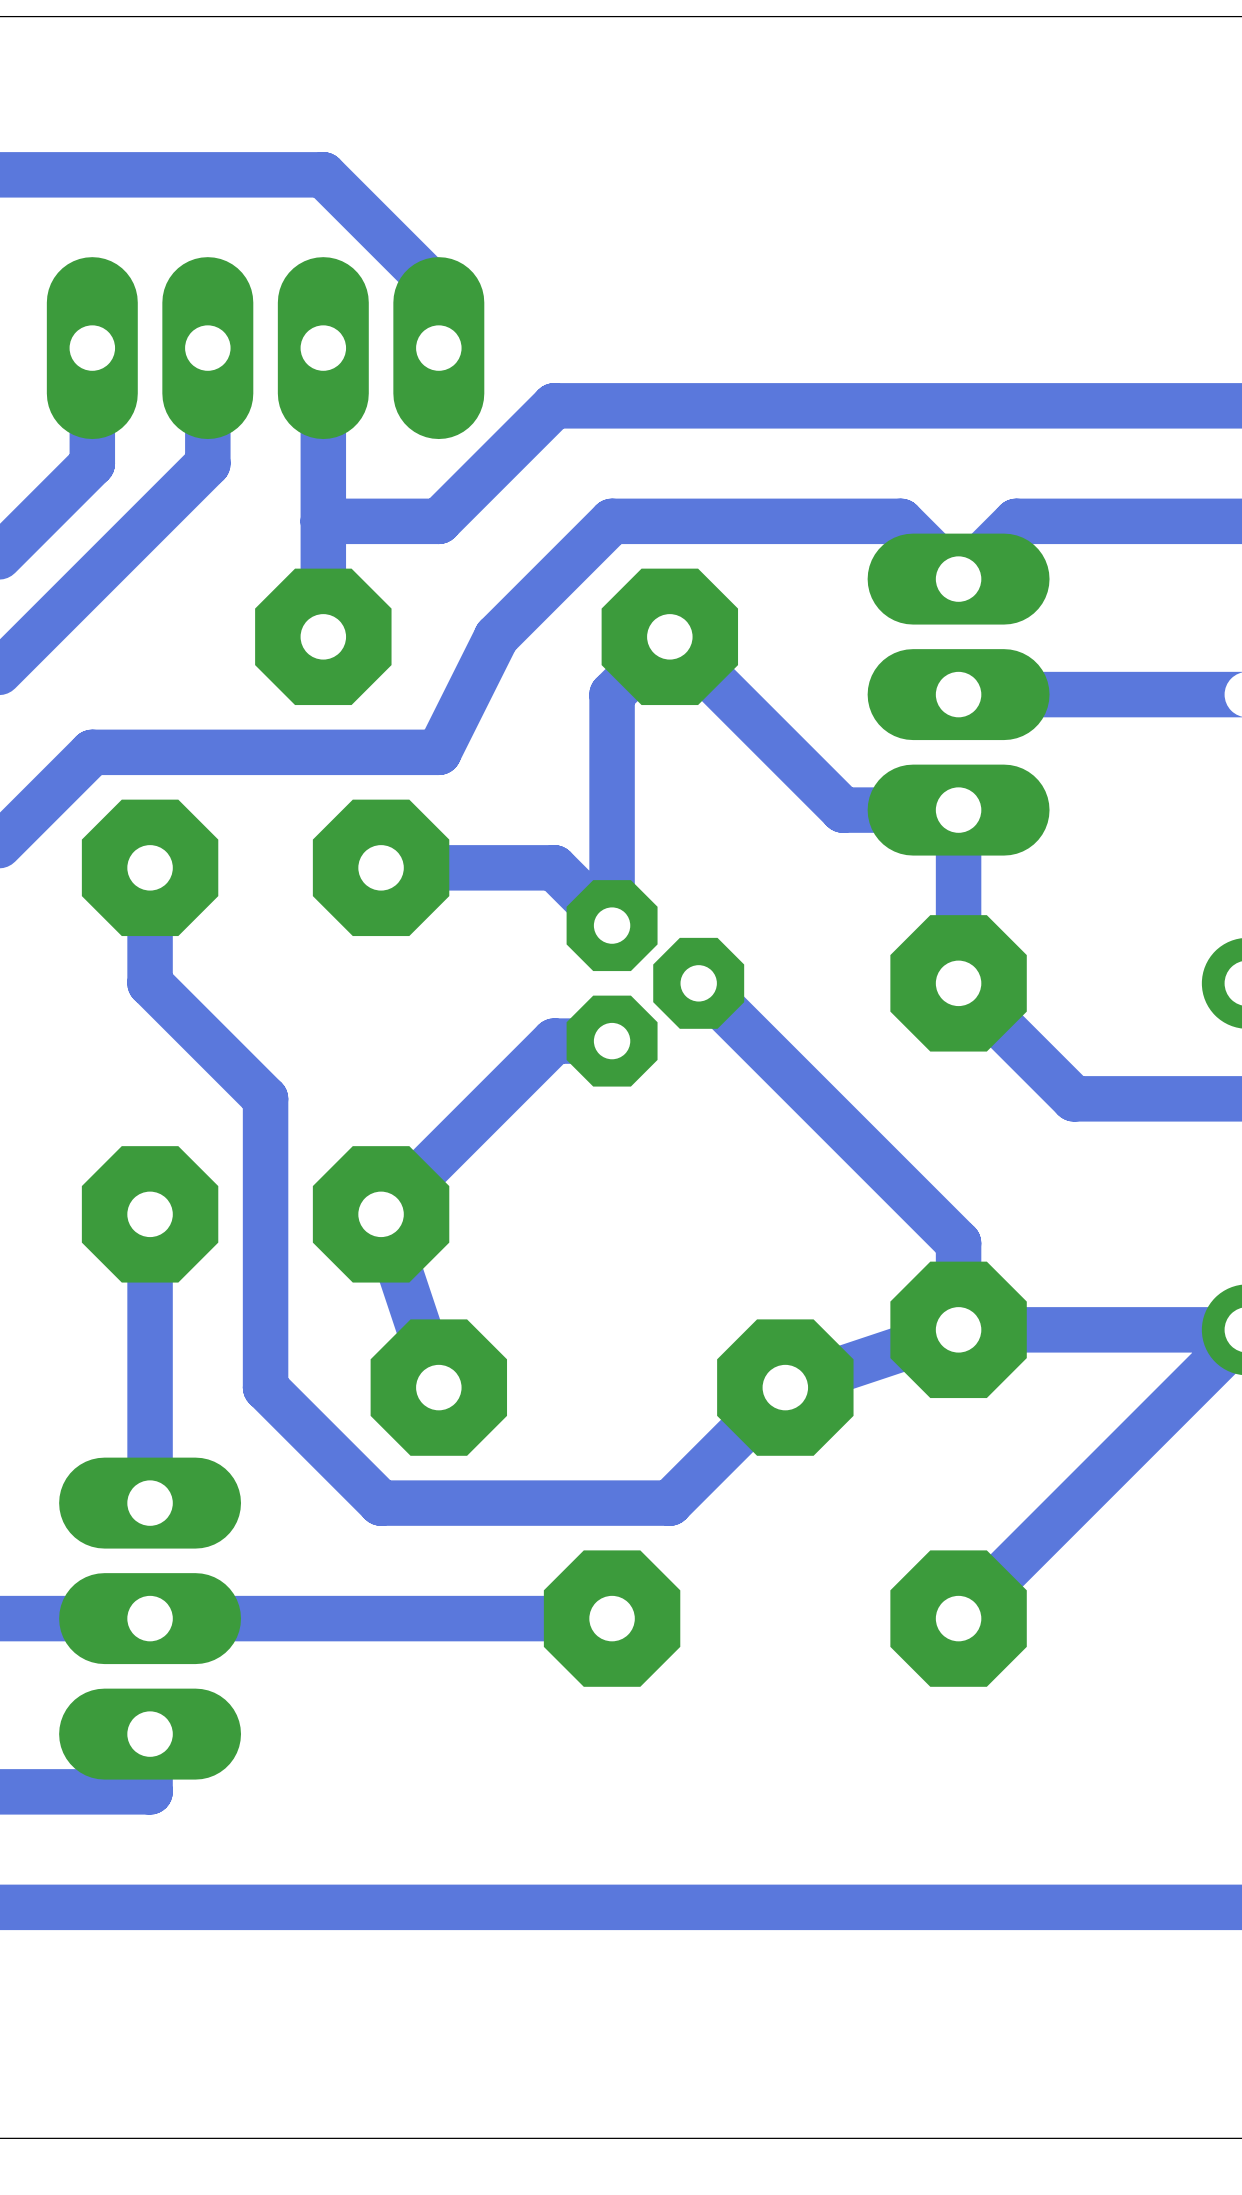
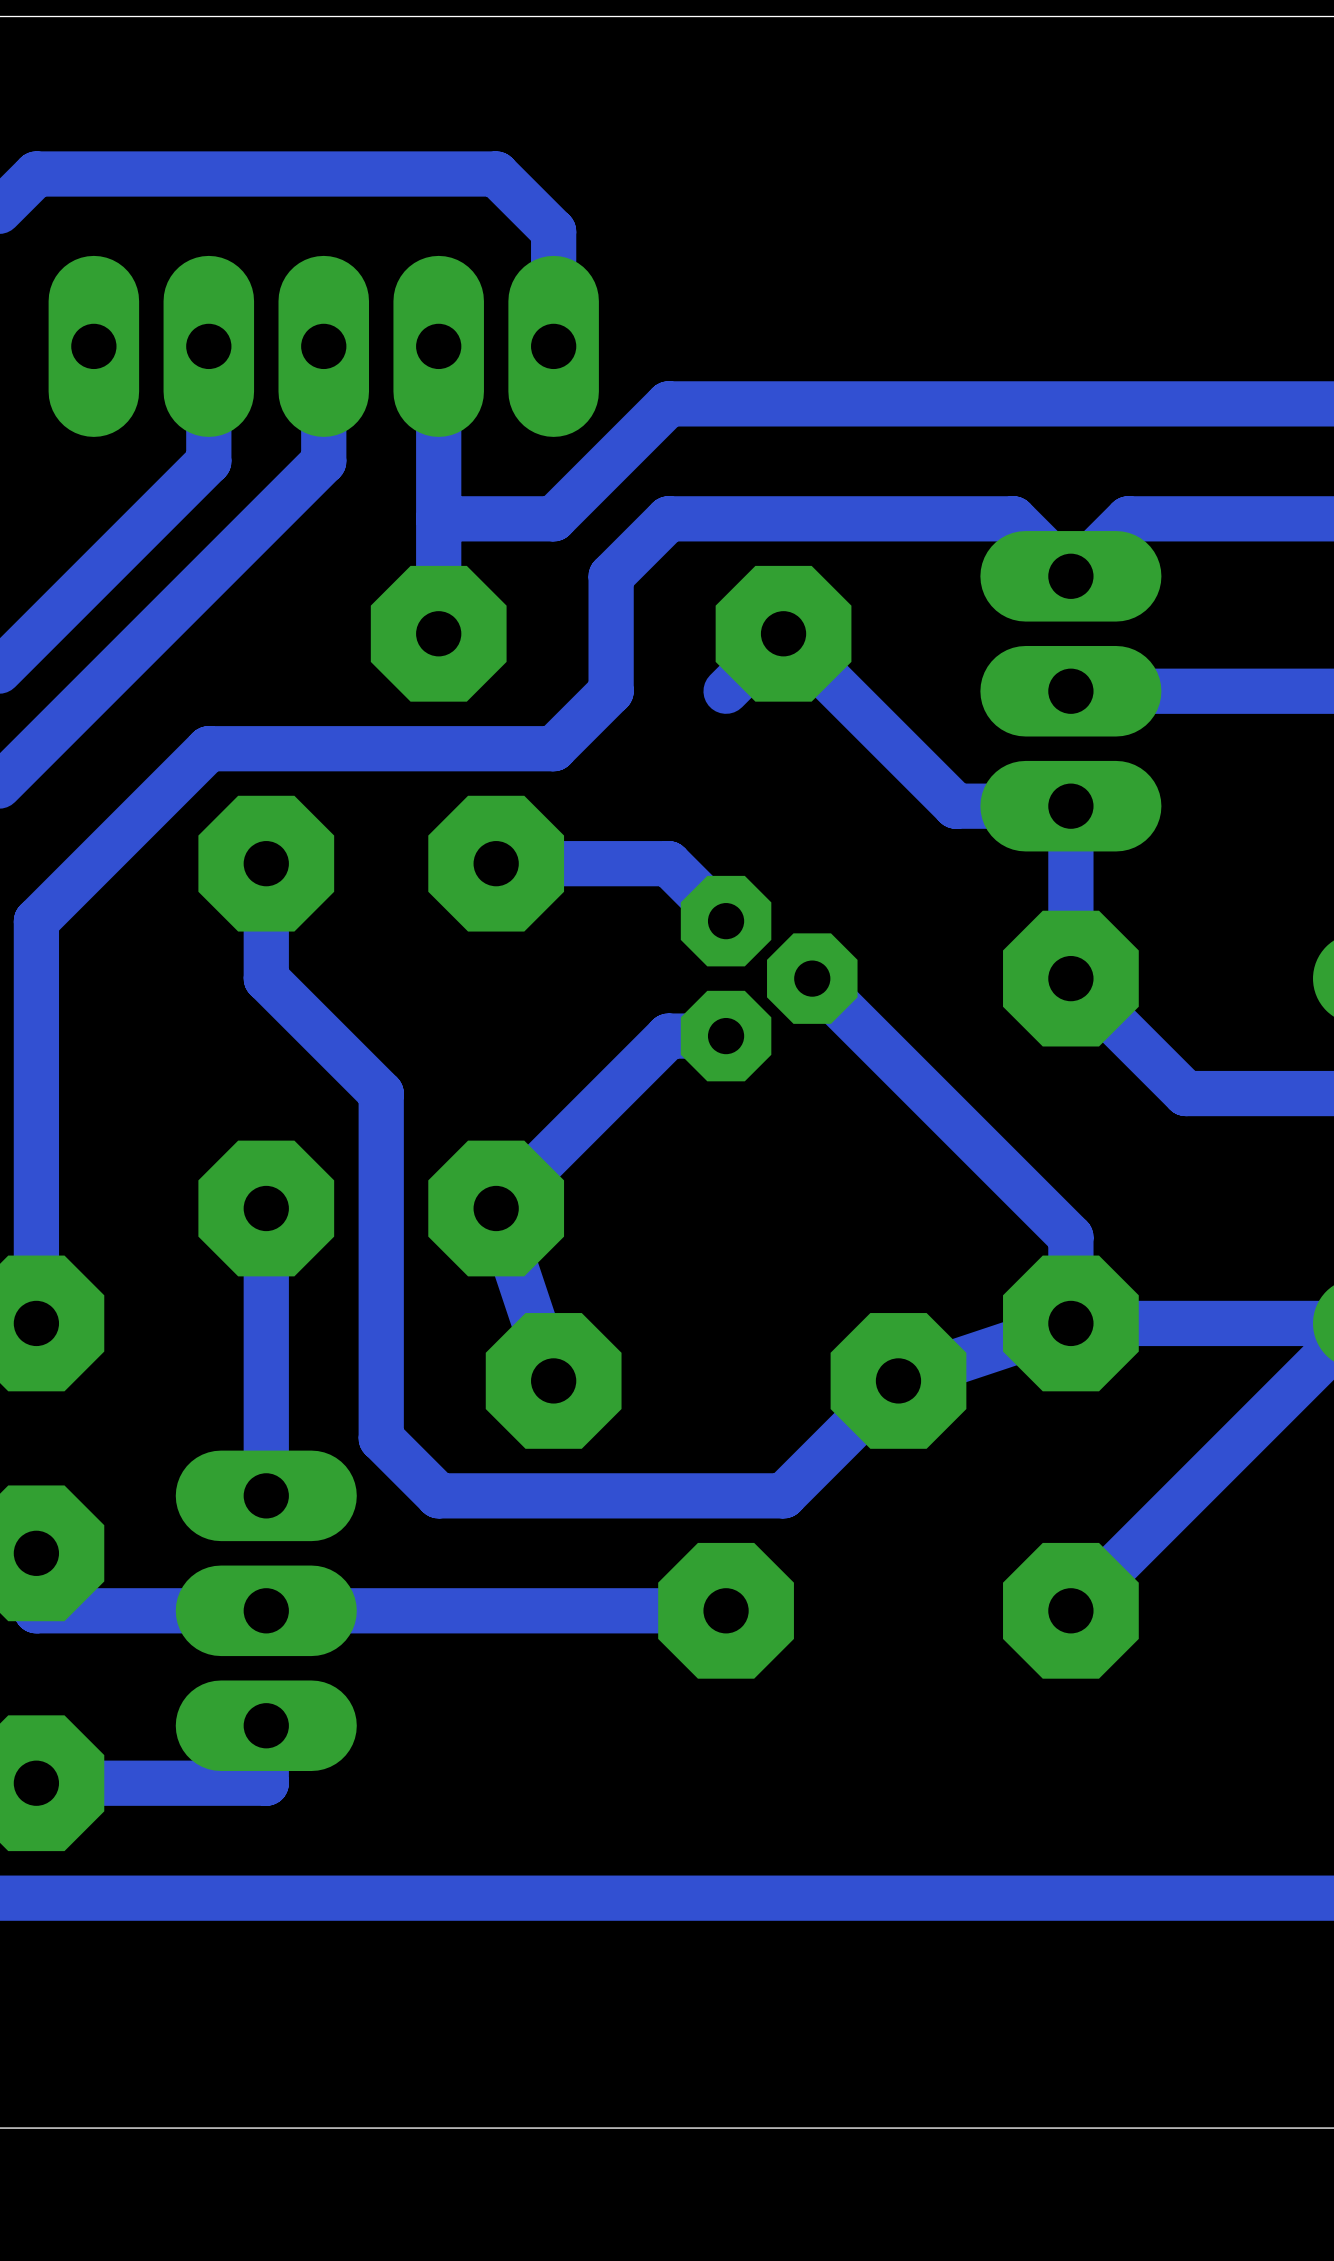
bottom track: (323, 174) (438, 290) -> (438, 173) (496, 173) (553, 231) (553, 288)
bottom track: (612, 521) (496, 636) (438, 752) -> (726, 518) (668, 518) (611, 576) (611, 691) (553, 748)
bottom track: (612, 694) (612, 925) -> none
bottom track: (265, 1387) (381, 1503) -> (381, 1380) (381, 1438) (438, 1495) (496, 1495)

